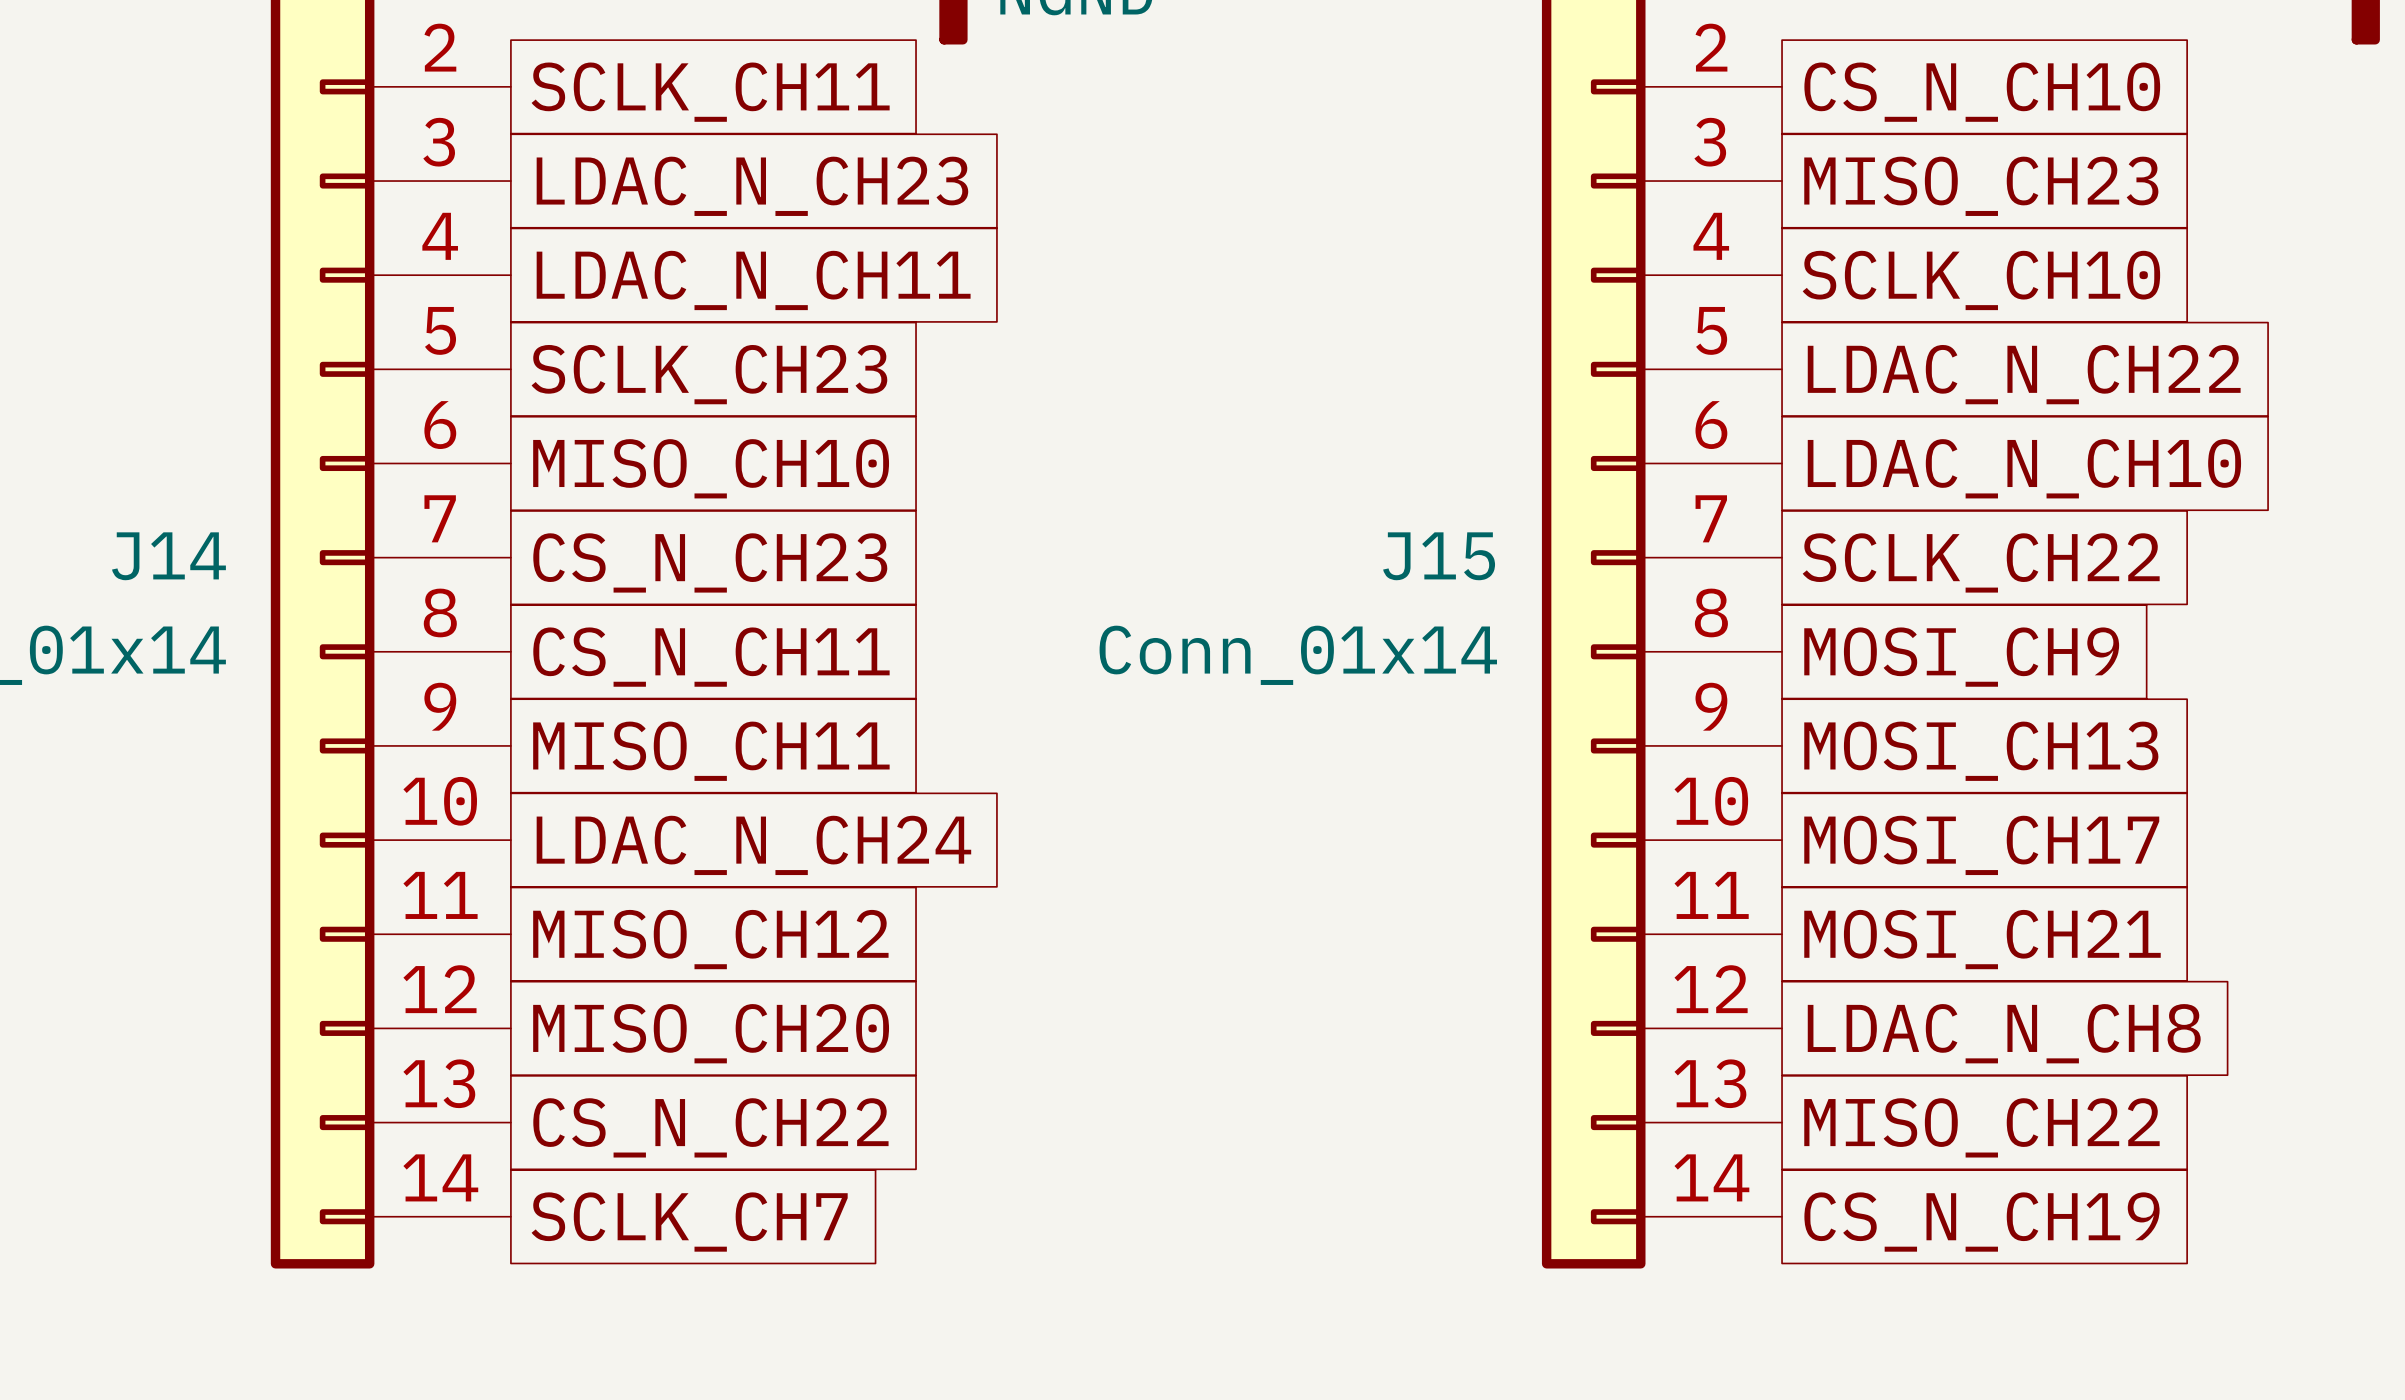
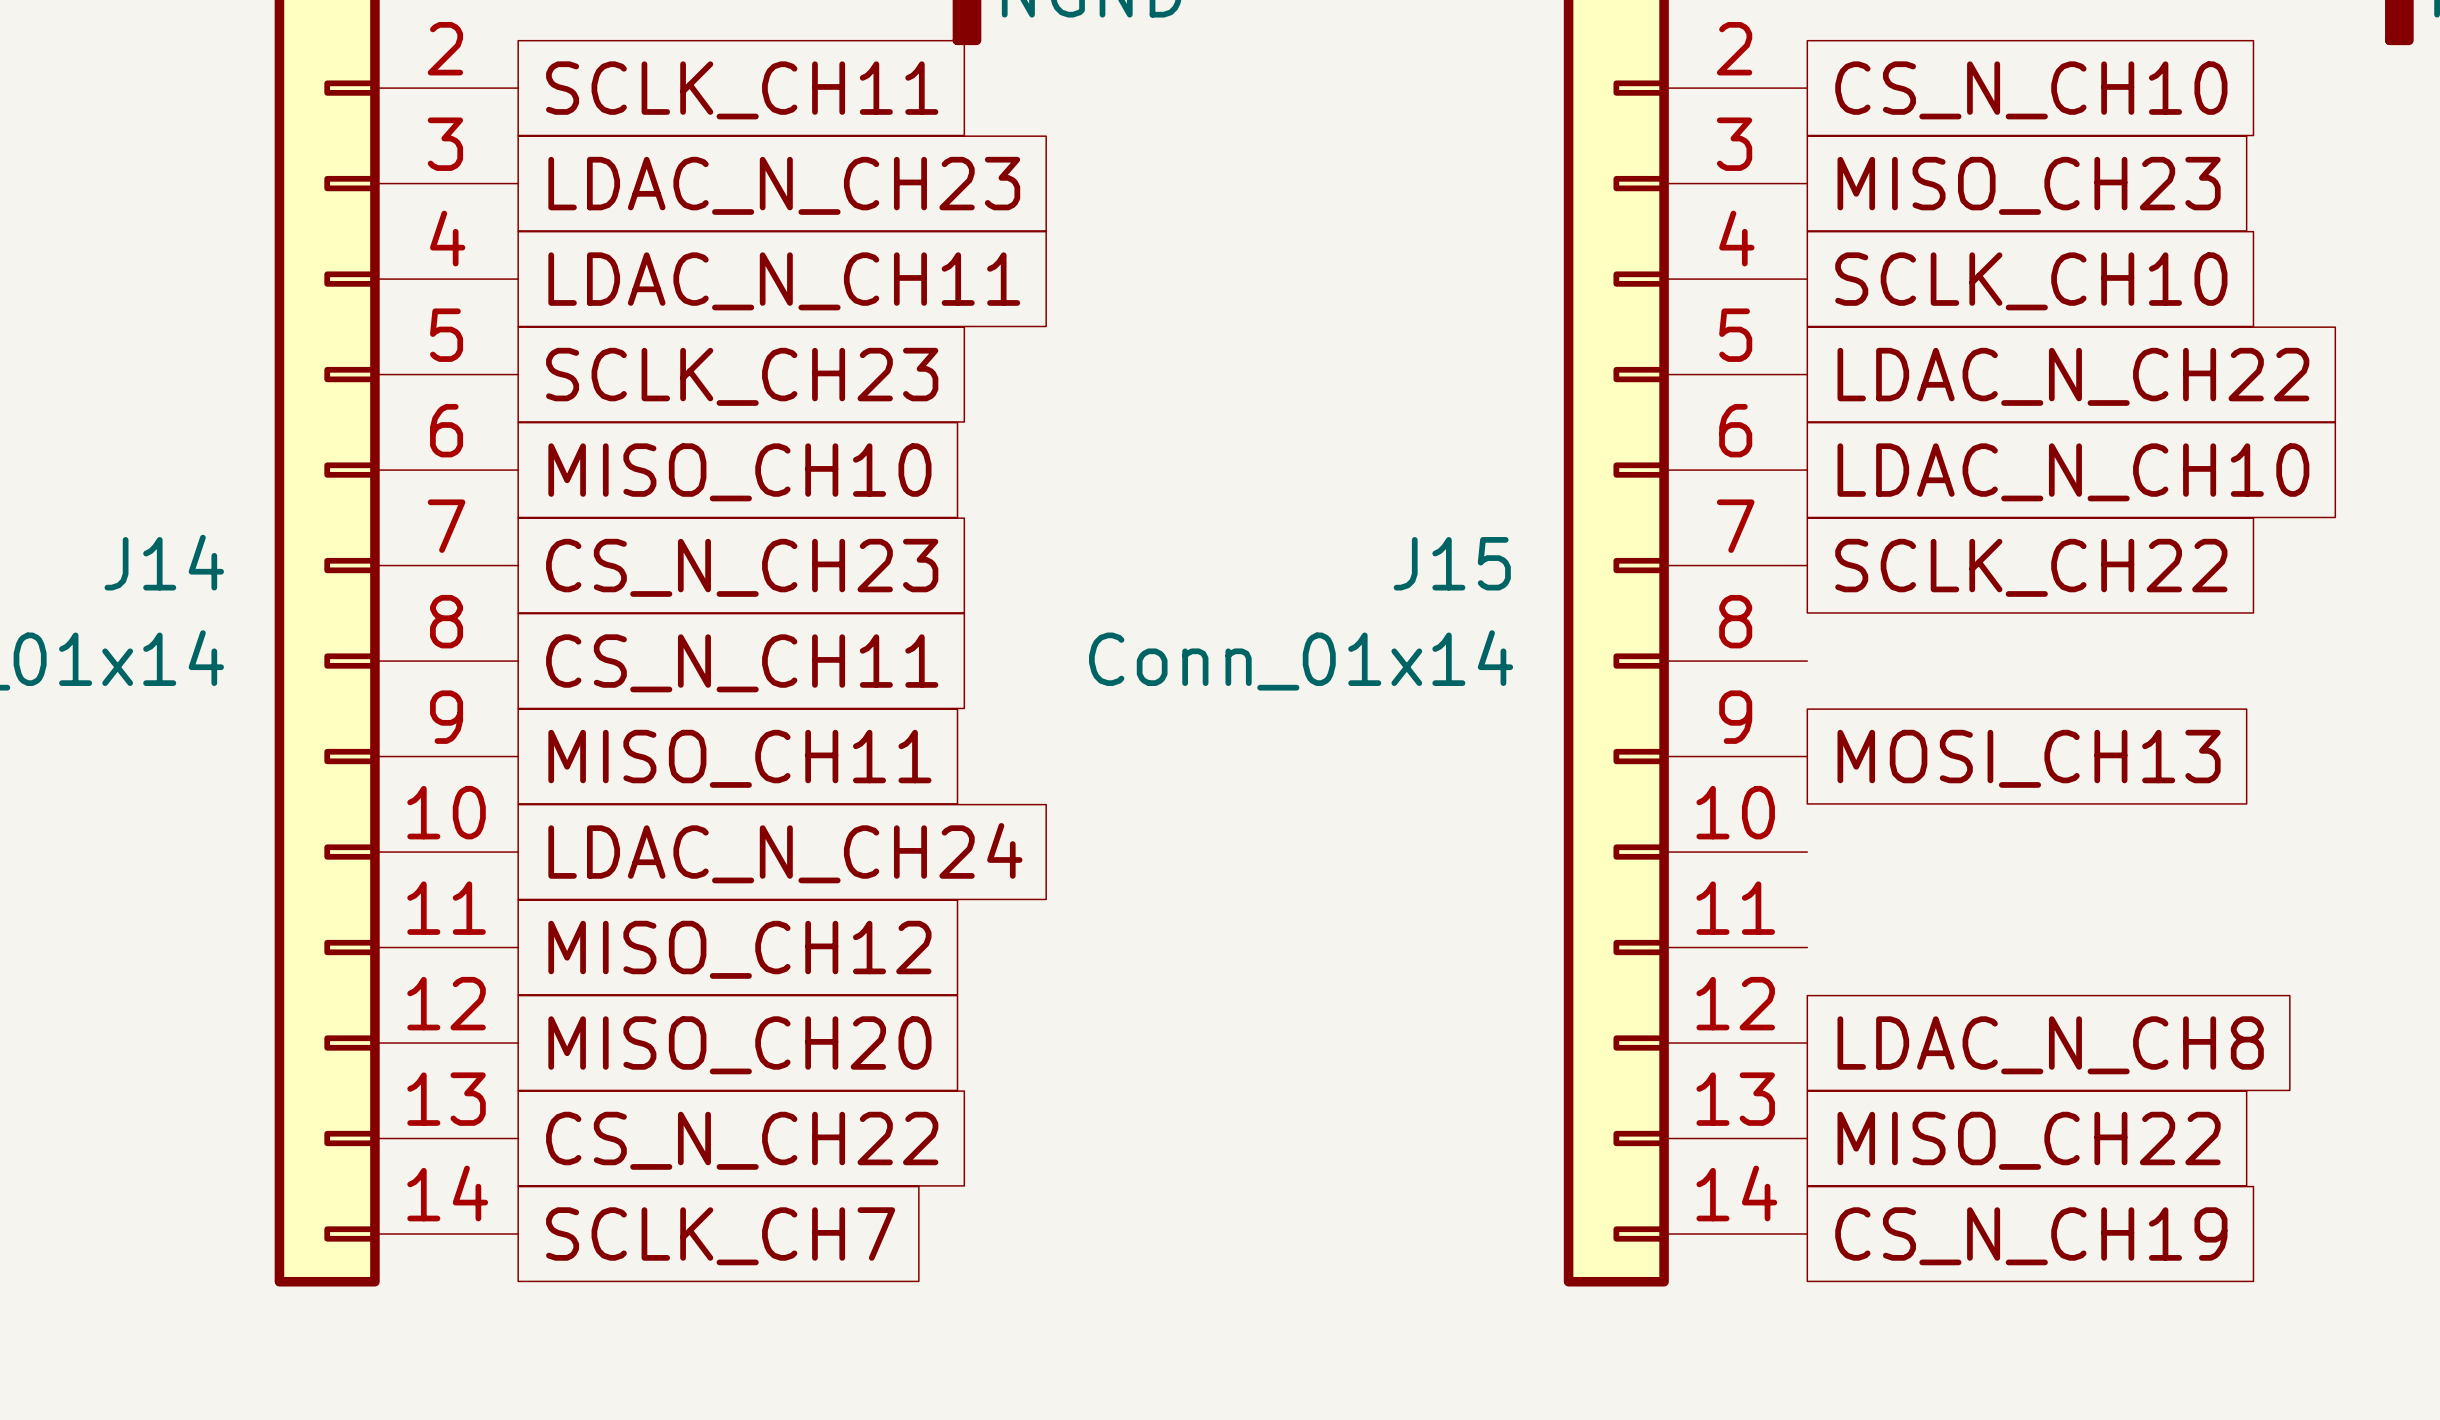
global label: MOSI_CH9 (1961, 657) -> none
global label: MOSI_CH17 (1981, 845) -> none
global label: MOSI_CH21 (1982, 939) -> none

